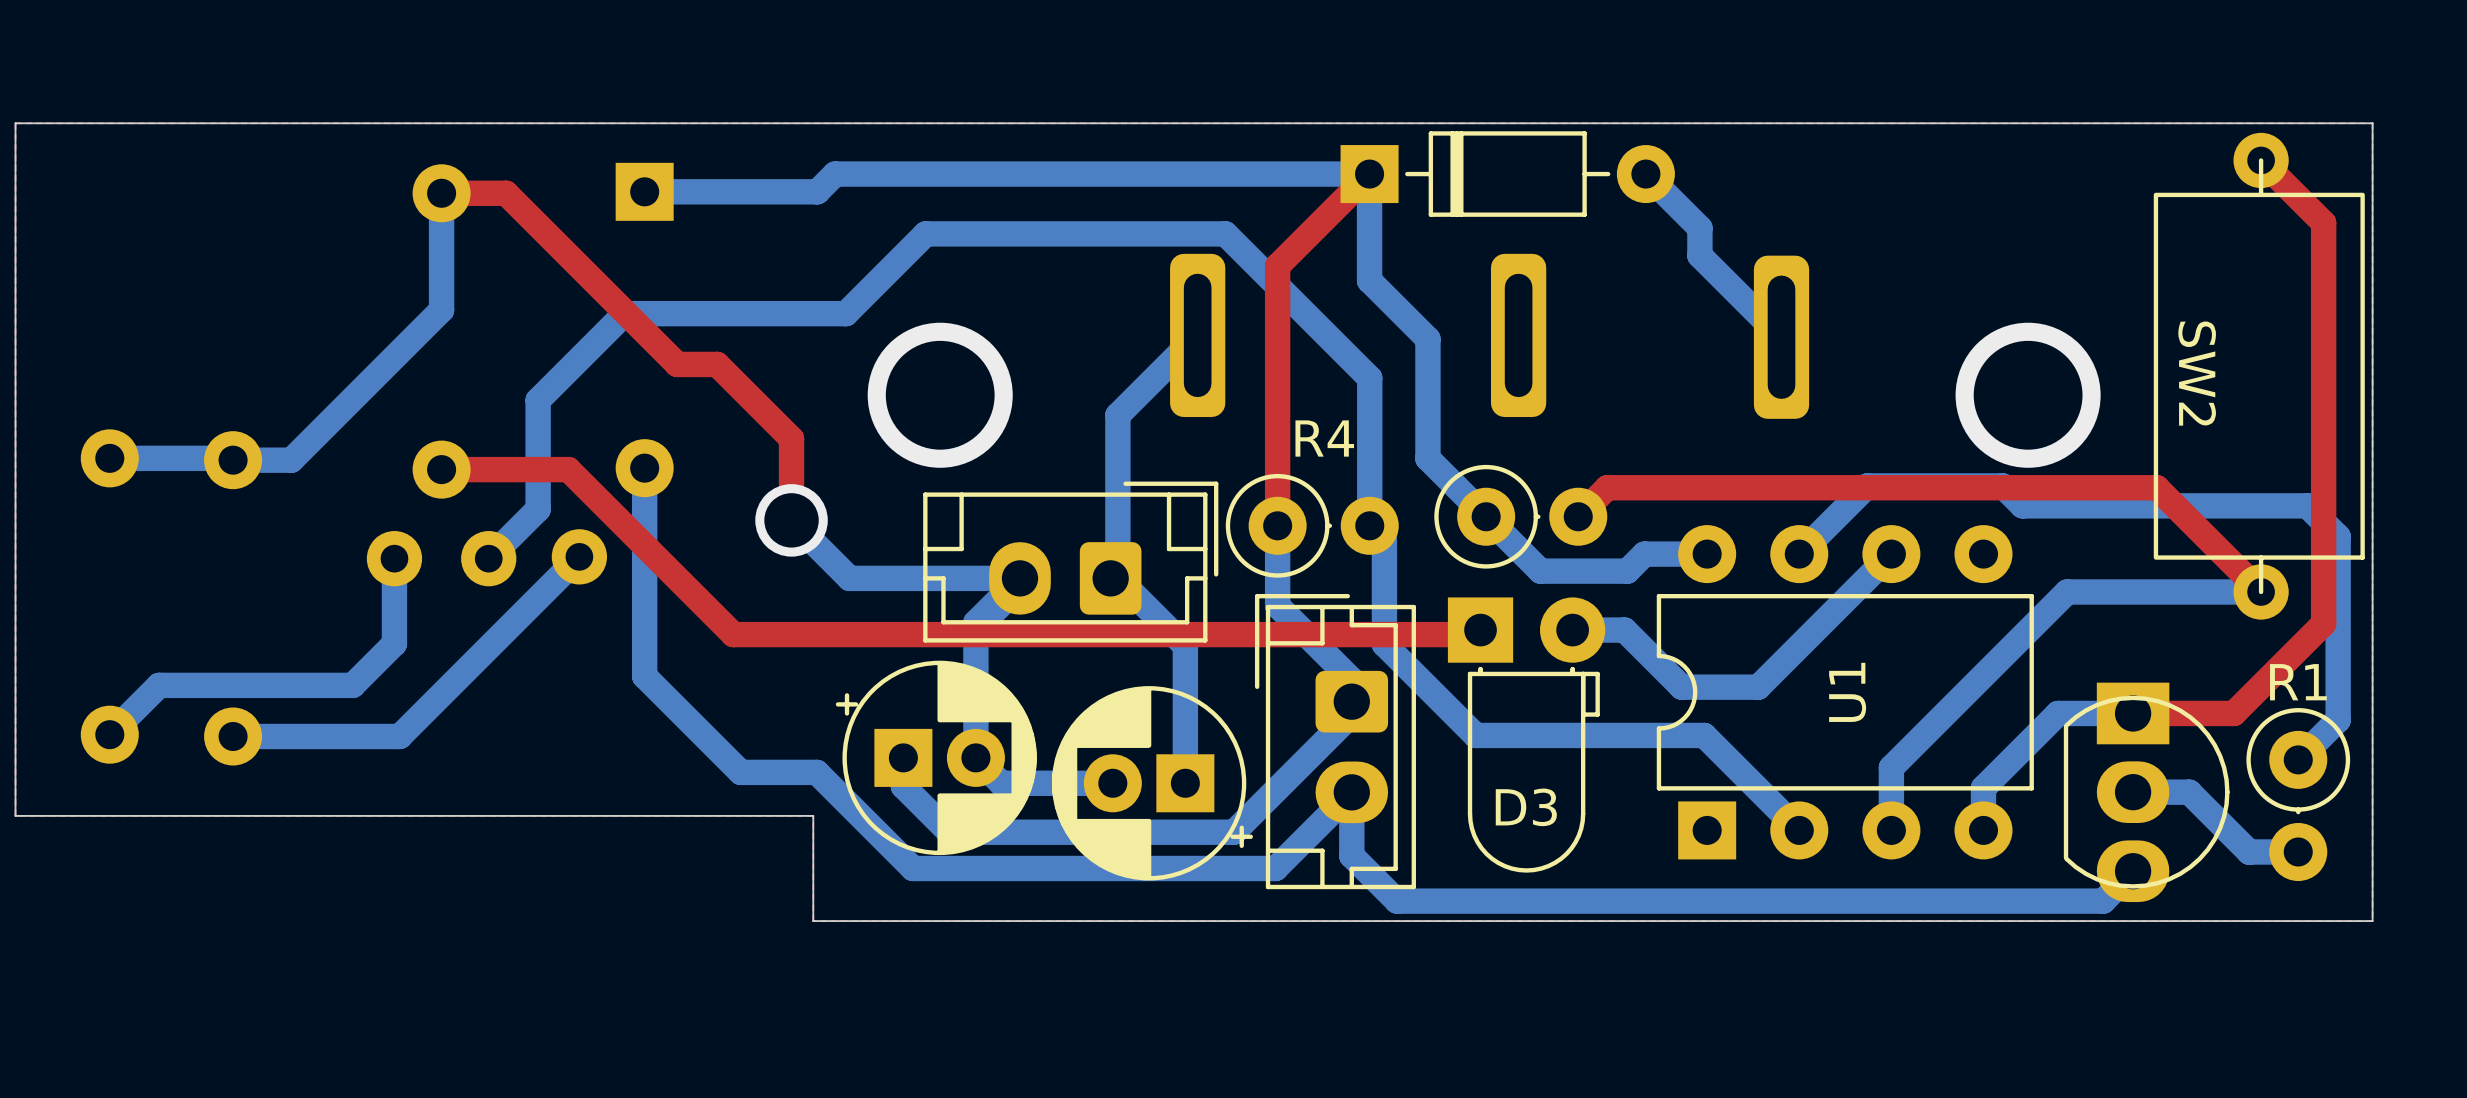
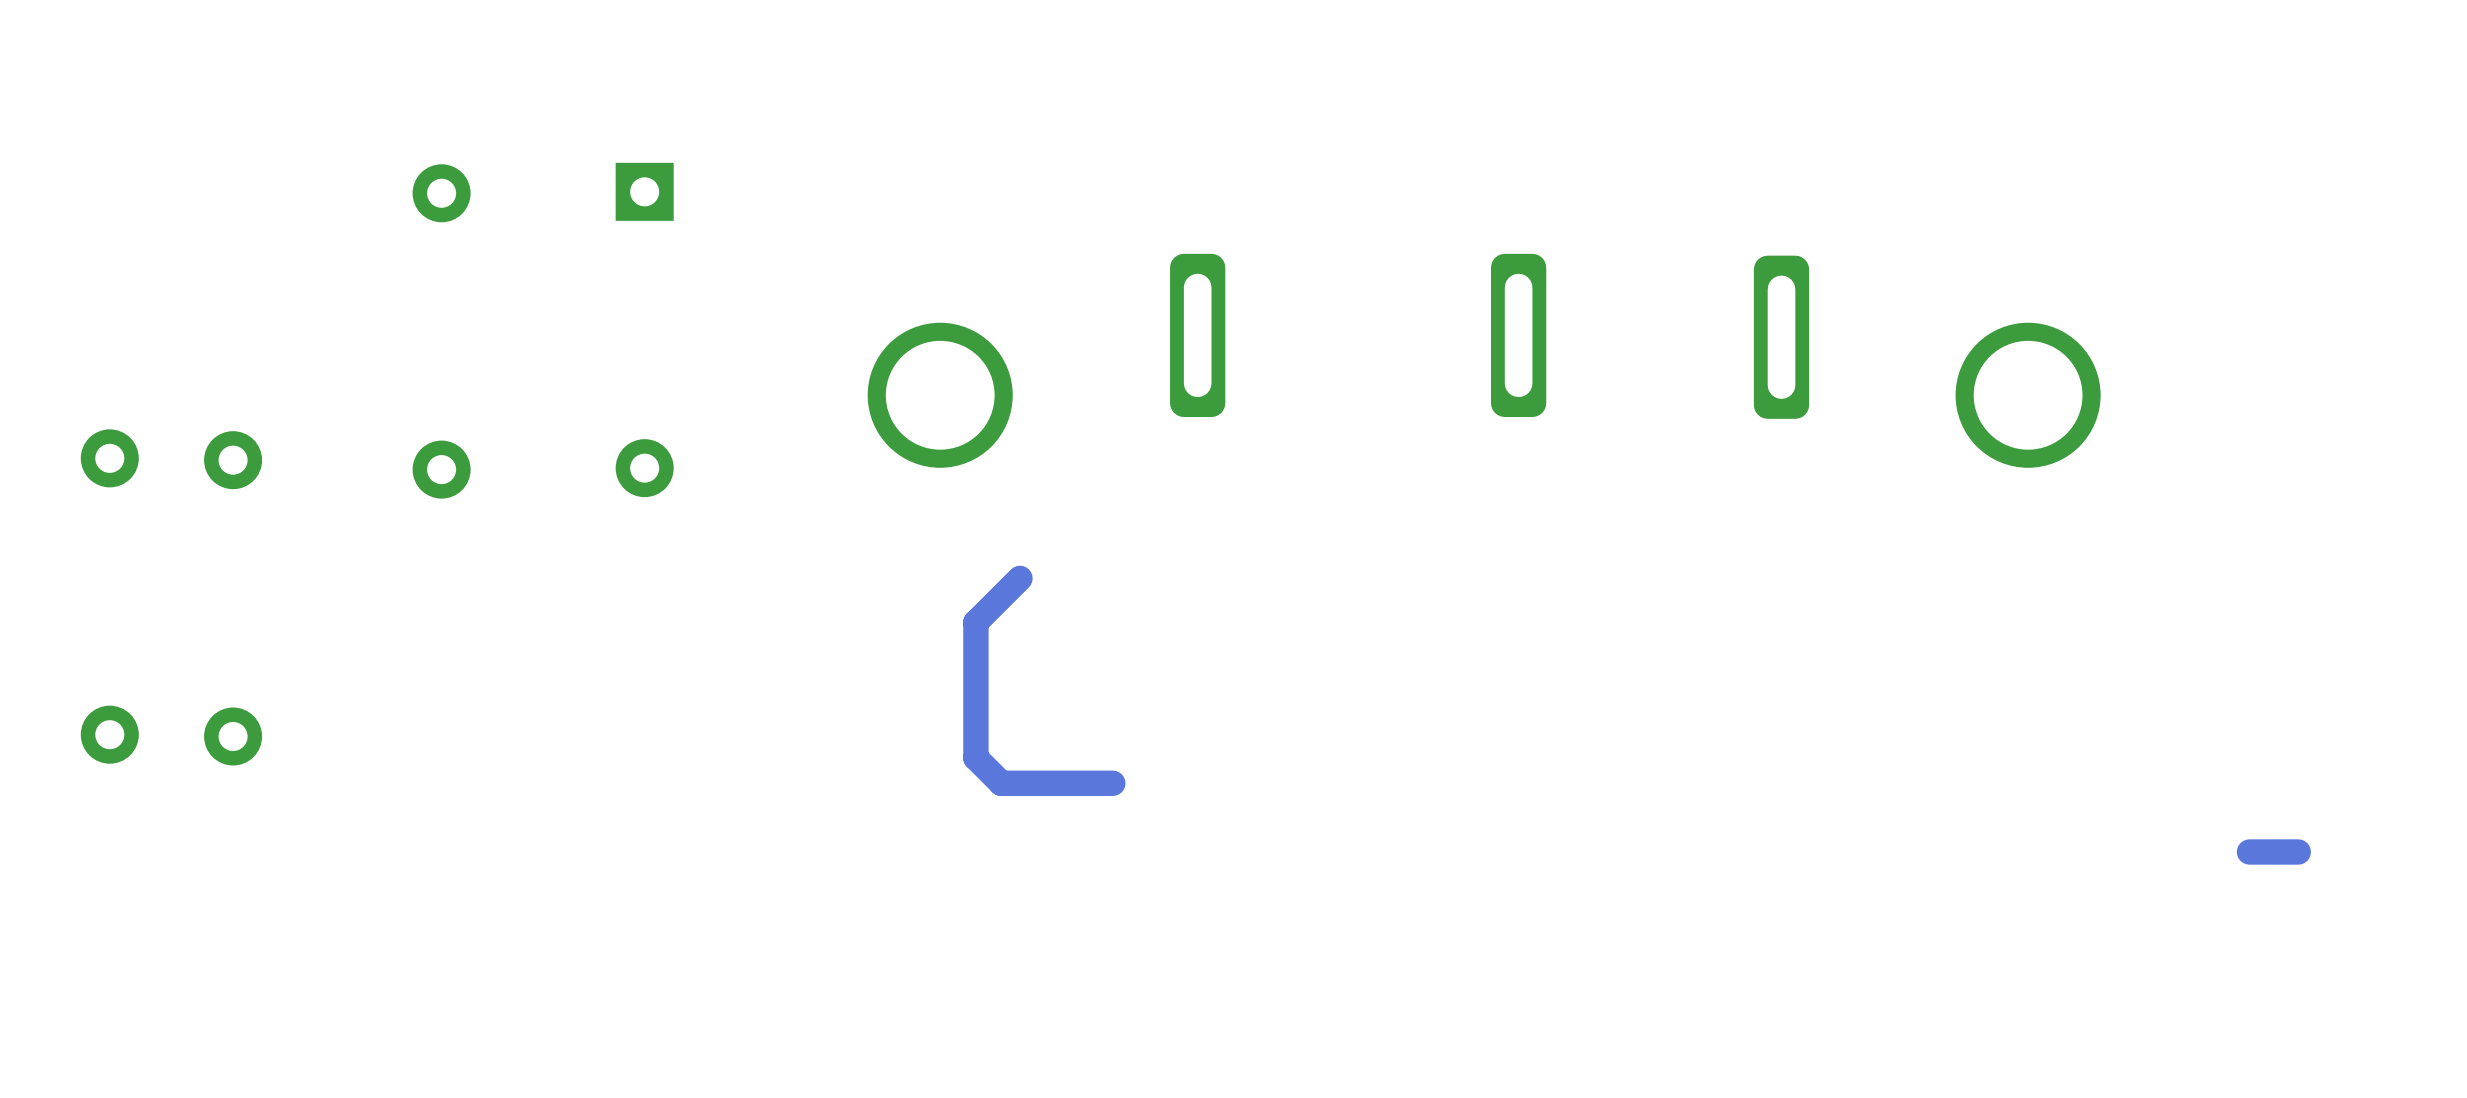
board edge: (15, 123) (15, 815) (813, 815) (813, 921) (2372, 921) (2372, 123) (15, 123) -> none
top track: (2261, 160) (2323, 223) (2323, 623) (2233, 713) (2133, 713) -> none
top track: (1369, 174) (1277, 265) (1277, 525) -> none
part: (1507, 174) -> none
bottom track: (1645, 174) (1699, 228) (1699, 255) (1781, 337) -> none
bottom track: (644, 191) (817, 191) (835, 174) (1369, 174) (1369, 280) (1427, 339) (1427, 458) (1540, 571) (1627, 571) (1644, 554) (1707, 554) -> none
bottom track: (441, 193) (441, 310) (291, 460) (109, 458) -> none
top track: (441, 193) (506, 193) (677, 364) (717, 364) (791, 438) (791, 520) -> none
bottom track: (1197, 335) (1117, 415) (1117, 578) (1185, 645) (1185, 783) -> none
SW2: (2259, 376) -> none
bottom track: (644, 468) (644, 676) (740, 772) (816, 772) (913, 868) (1275, 868) (1351, 792) (1351, 855) (1397, 901) (2103, 901) (2133, 871) -> none
top track: (441, 469) (568, 469) (733, 634) (1476, 634) (1480, 630) -> none
part: (1520, 516) -> none
top track: (1578, 516) (1607, 487) (2156, 487) (2261, 591) -> none
bottom track: (791, 520) (849, 578) (1027, 578) (975, 629) -> none
via: (791, 520) -> none
bottom track: (1277, 525) (1277, 605) (1351, 679) (1351, 714) (1233, 832) (949, 832) (903, 786) (903, 757) -> none
R4: (1312, 525) -> none
bottom track: (1799, 554) (1867, 485) (2002, 485) (2022, 505) (2307, 505) (2338, 536) (2338, 720) (2298, 759) -> none
bottom track: (1891, 554) (1758, 687) (1681, 687) (1624, 630) (1572, 630) -> none
bottom track: (579, 556) (399, 736) (233, 736) -> none
part: (486, 557) -> none
bottom track: (394, 558) (394, 643) (352, 685) (159, 685) (109, 734) -> none
bottom track: (488, 558) (538, 509) (538, 400) (624, 313) (845, 313) (925, 233) (1225, 233) (1369, 378) (1369, 525) (1384, 540) (1384, 644) (1475, 735) (1704, 735) (1799, 830) -> none
part: (1070, 562) -> none
bottom track: (2261, 591) (2067, 591) (1891, 767) (1891, 830) -> none
U1: (1845, 692) -> none
bottom track: (2139, 713) (2058, 713) (1983, 787) (1983, 830) -> none
D3: (1526, 735) -> none
part: (1335, 741) -> none
part: (936, 757) -> none
part: (1152, 783) -> none
bottom track: (2133, 792) (2189, 792) (2249, 852) -> none
part: (2146, 792) -> none
R1: (2298, 794) -> none

